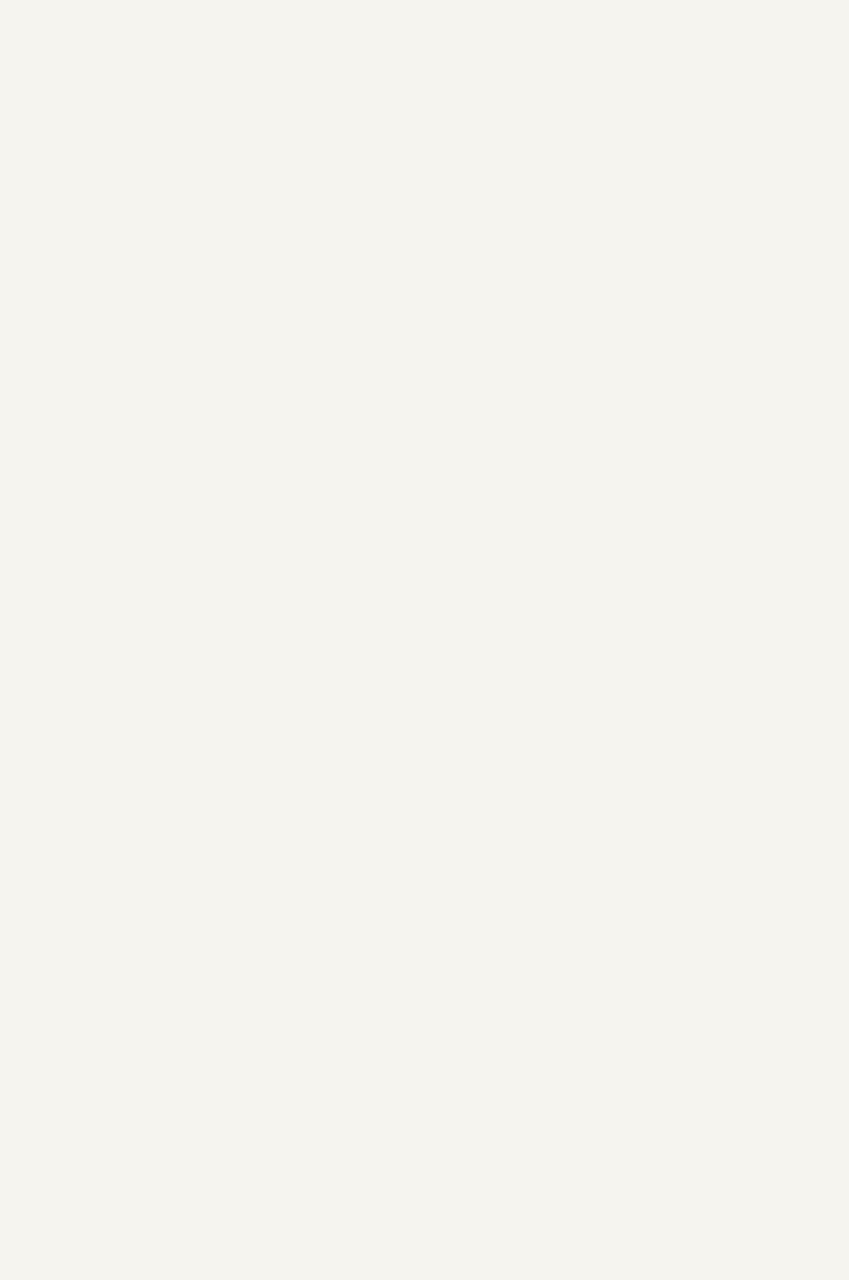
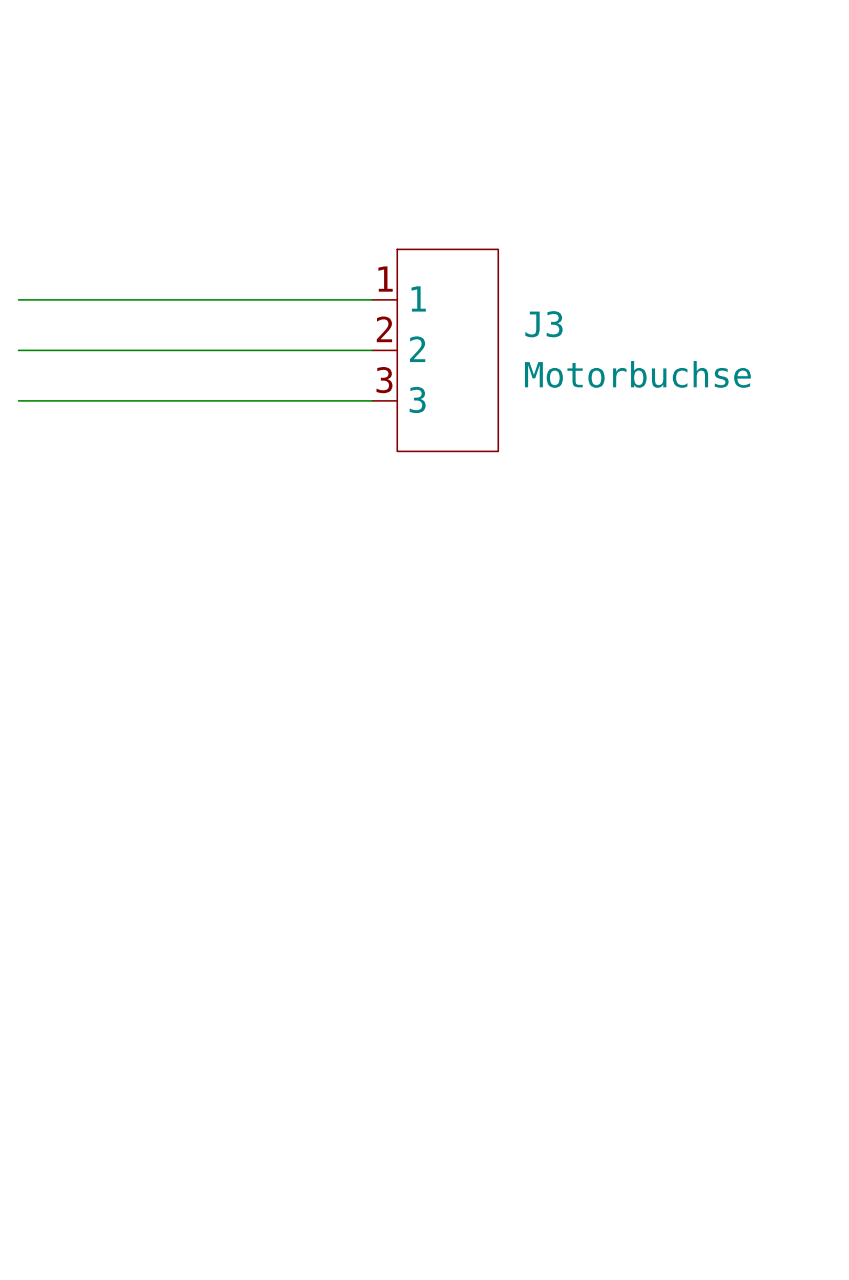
wire: none -> (18, 299) (372, 299)
wire: none -> (18, 350) (372, 350)
J3: none -> Motorbuchse (435, 350)
wire: none -> (18, 400) (372, 400)

